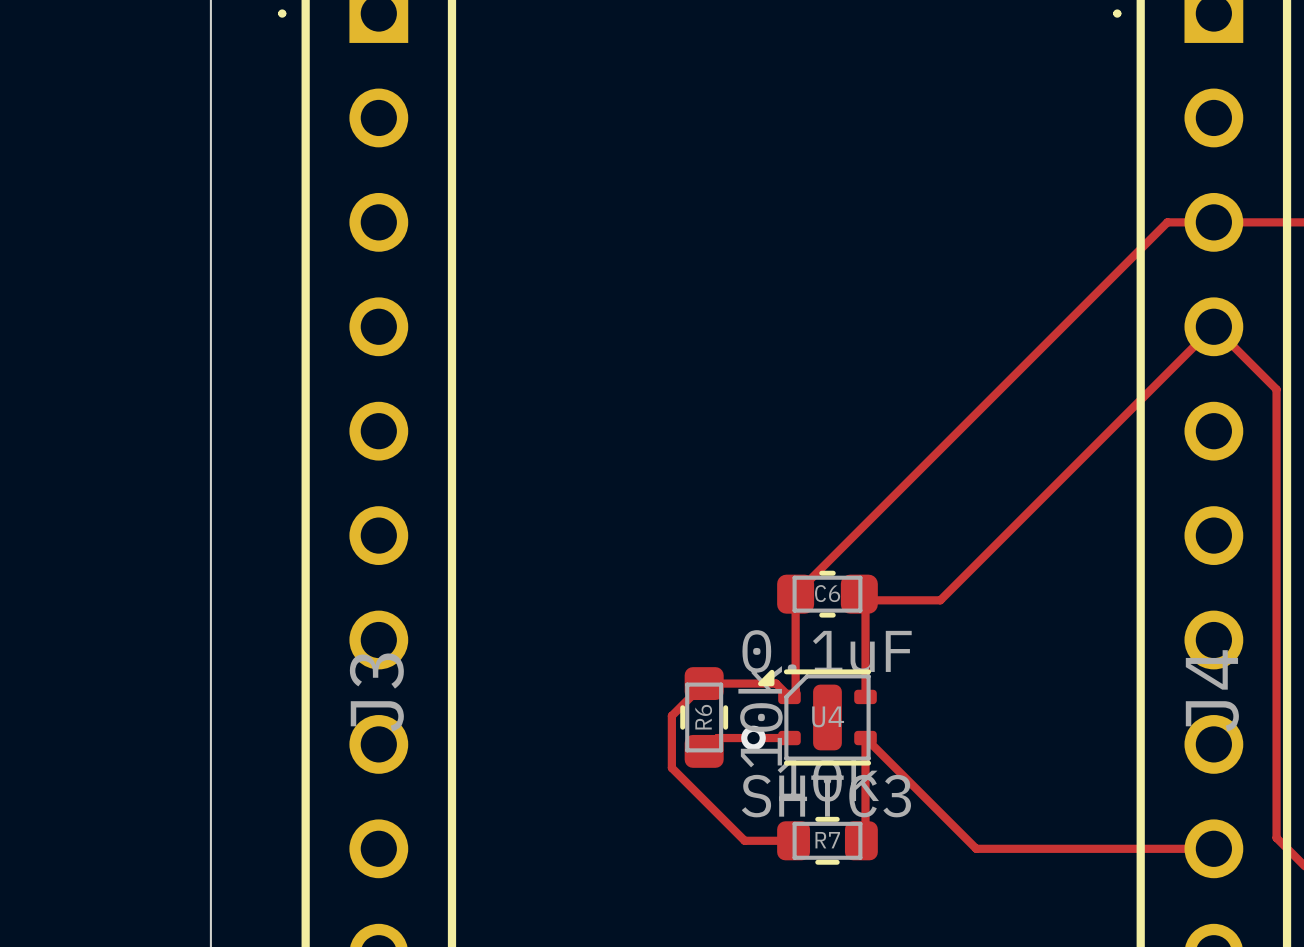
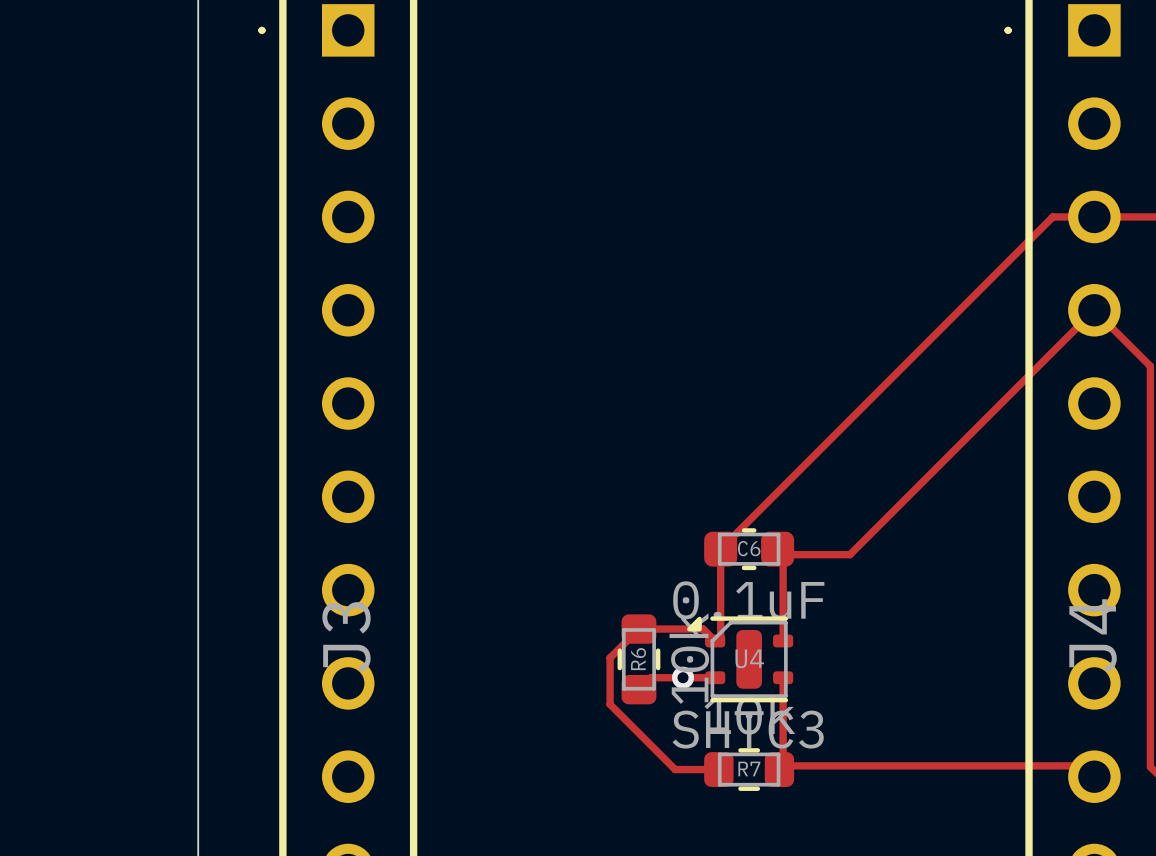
track: (865, 738) (976, 848) (1213, 848) -> (783, 765) (1083, 765) (1094, 776)

